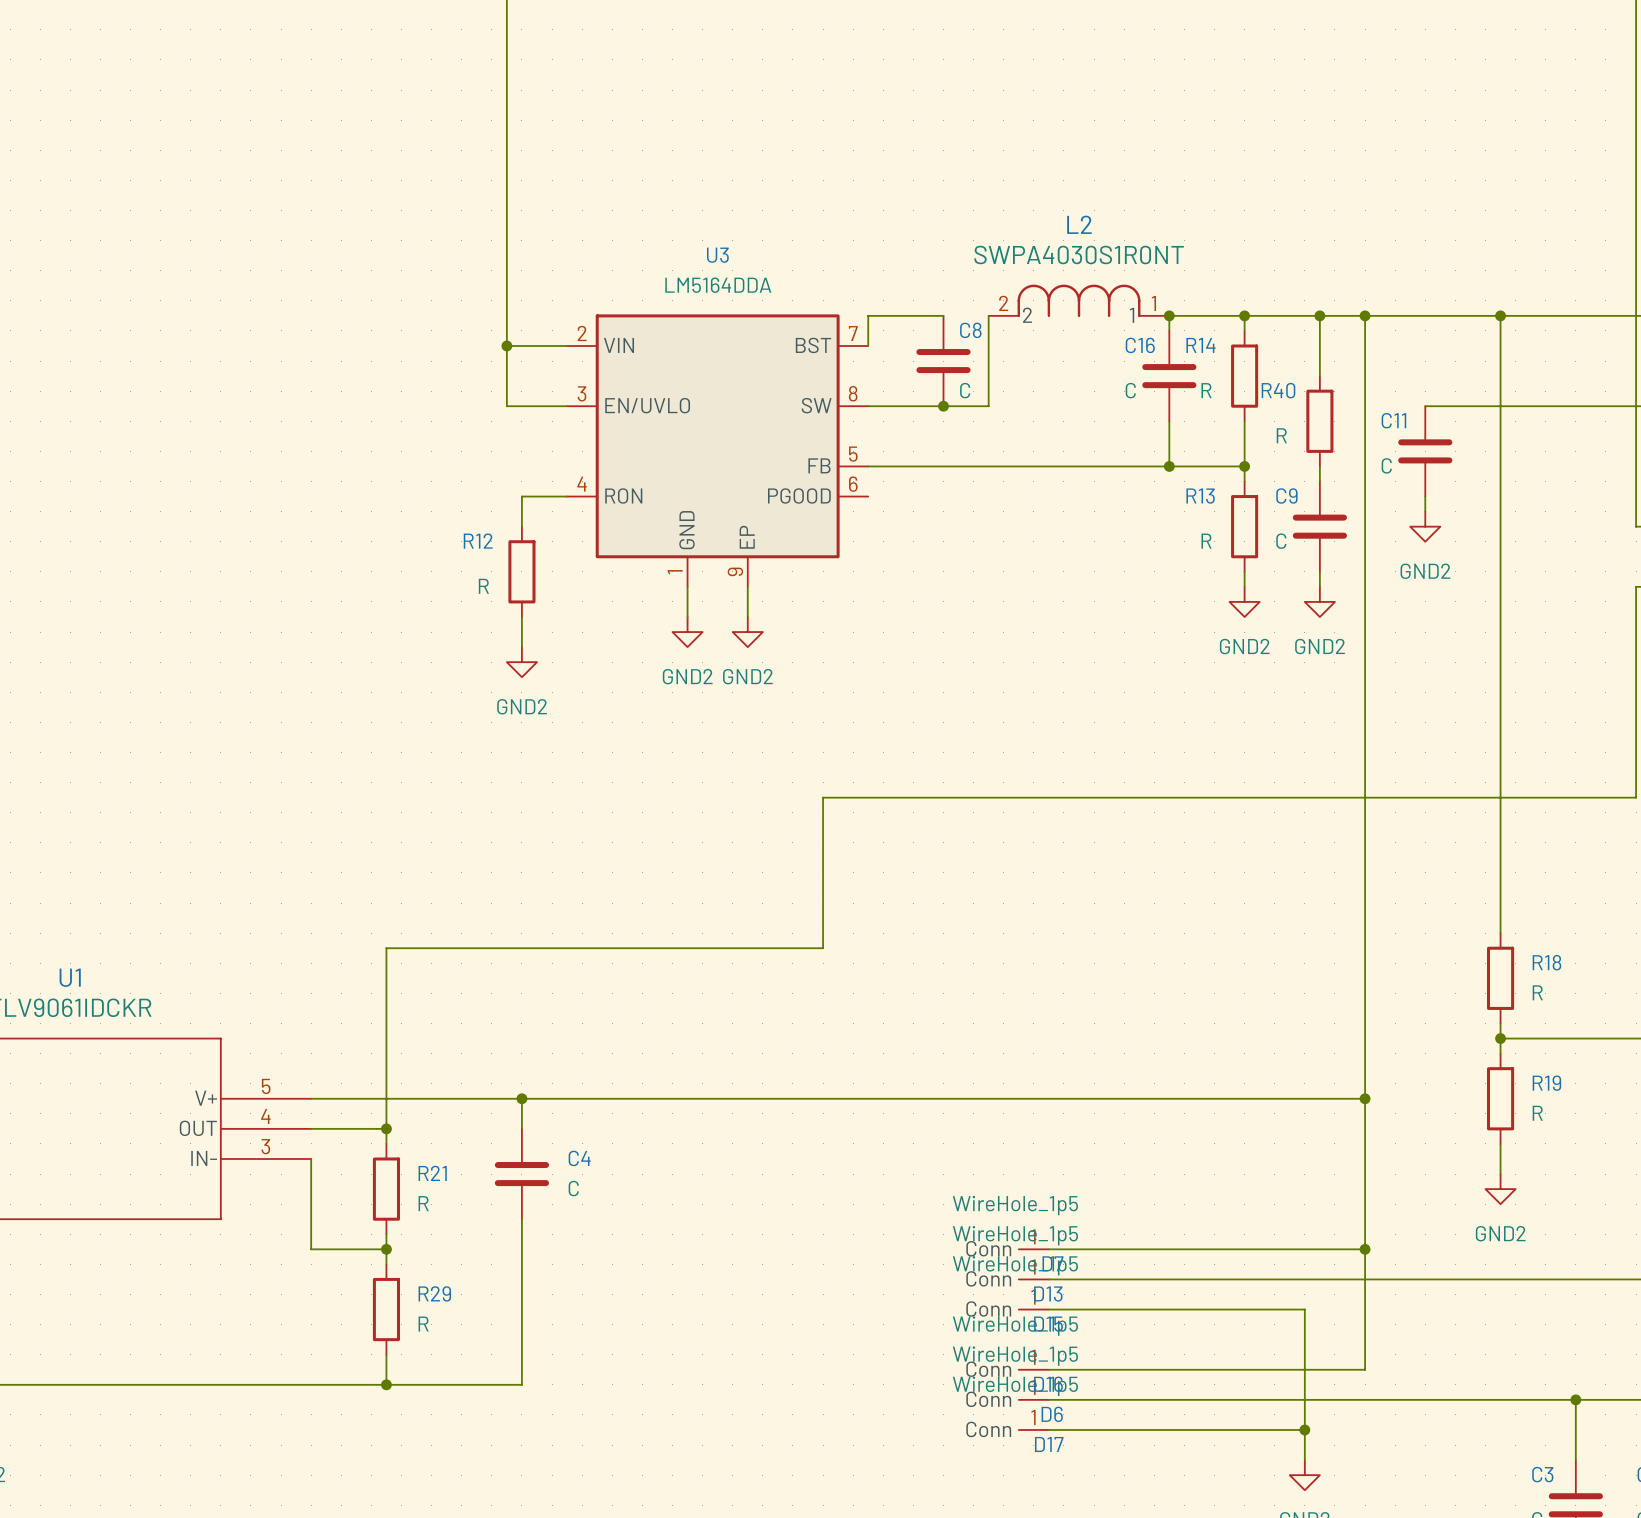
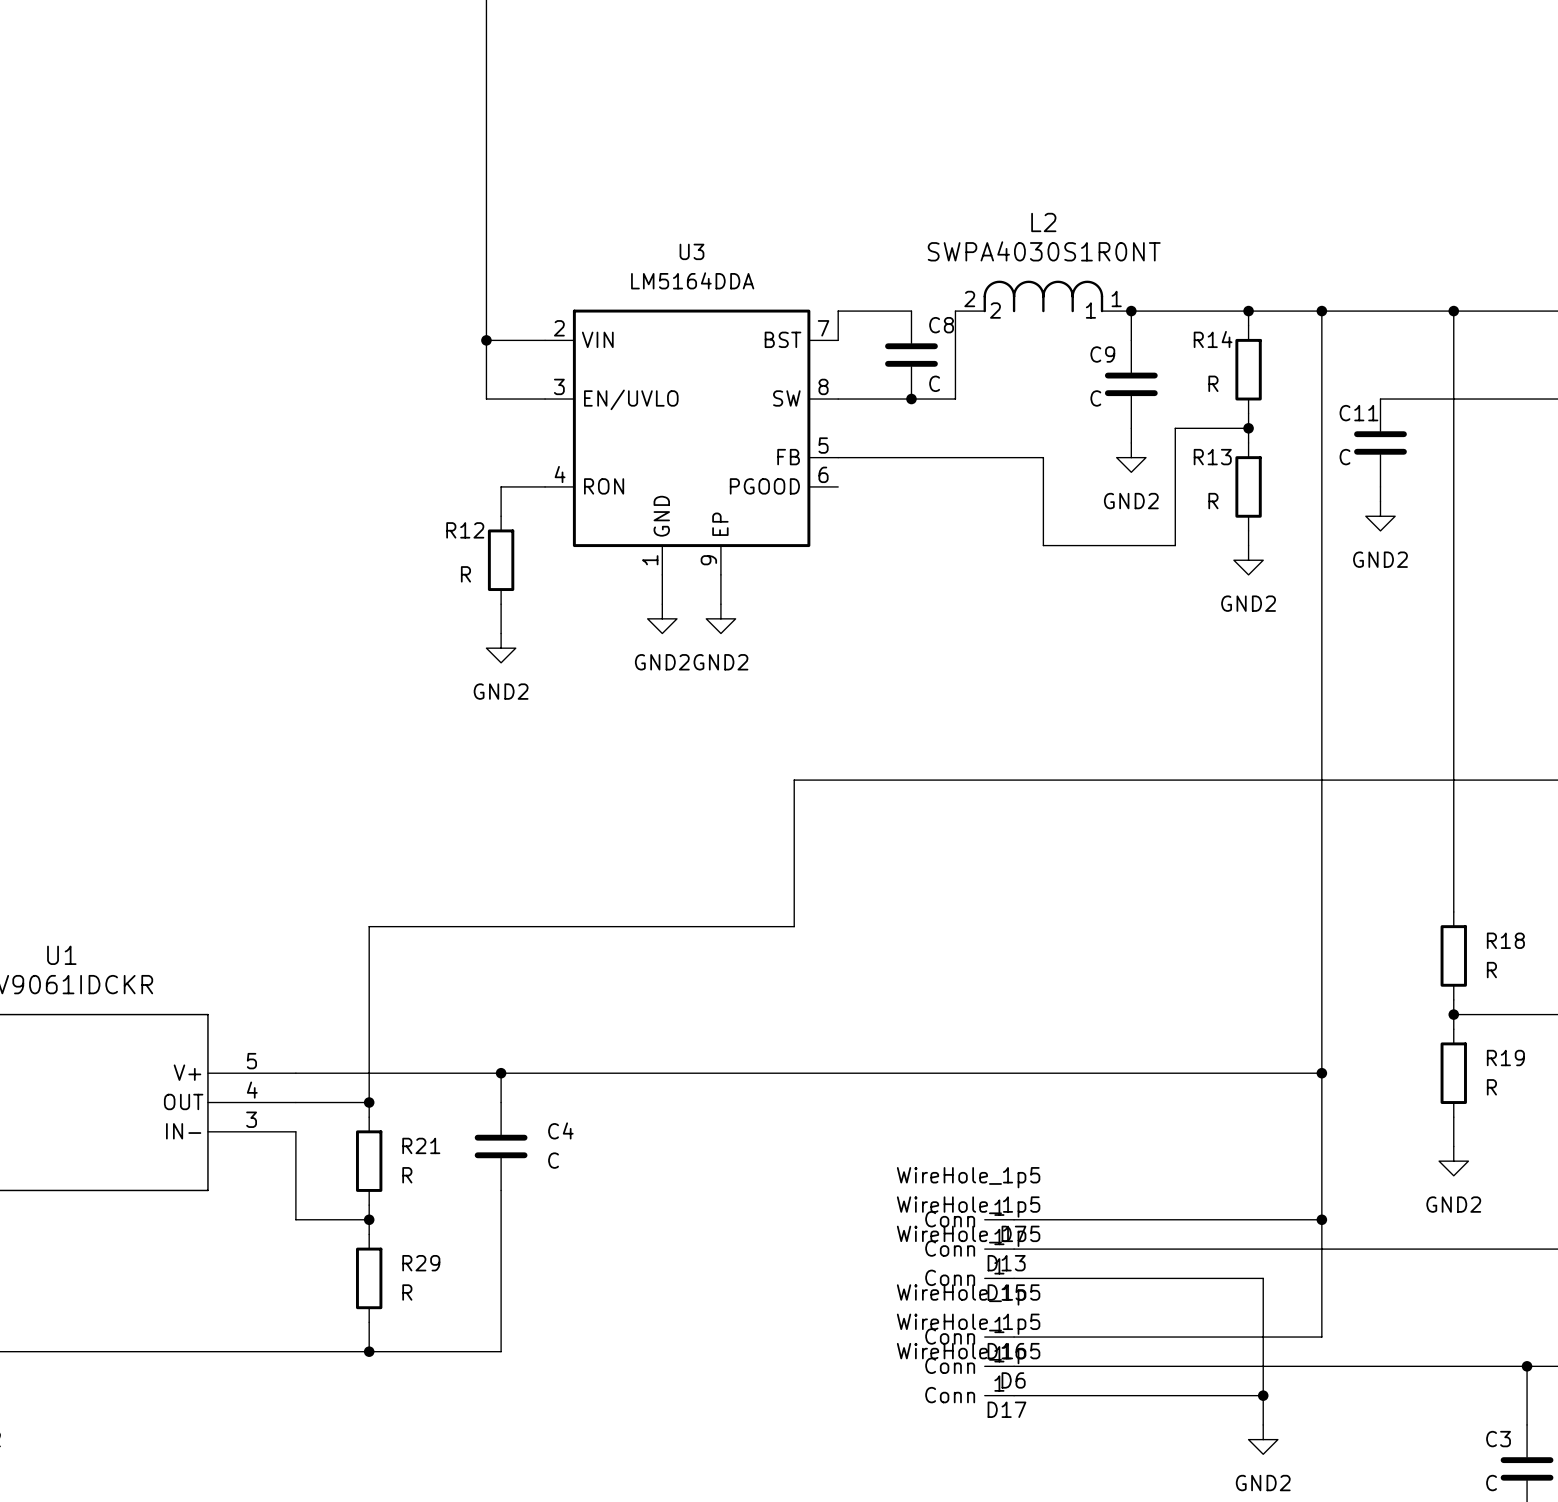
wire: (1244, 315) (1244, 330) -> (1248, 311) (1248, 325)
junction: (1244, 315) -> none
junction: none -> (1248, 311)
wire: (1319, 315) (1319, 376) -> none
junction: (1319, 315) -> none
C16: C (1169, 376) -> none
R14 position: (1244, 376) -> (1248, 369)
wire: (1244, 421) (1244, 481) -> none
wire: none -> (1248, 413) (1248, 442)
R40: R (1319, 421) -> none
wire: (1079, 466) (1244, 466) -> (1043, 457) (1043, 545) (1175, 545) (1175, 428) (1248, 428)
junction: (1169, 466) -> none
power symbol: none -> GND2 (1131, 457)
junction position: (1244, 466) -> (1248, 428)
wire: (1319, 466) (1319, 481) -> none
R13 position: (1244, 526) -> (1248, 486)
C9 position: (1319, 526) -> (1131, 384)
wire: (1244, 571) (1244, 586) -> none
power symbol: none -> GND2 (1248, 560)
wire: (1319, 571) (1319, 586) -> (1248, 530) (1248, 545)
power symbol: GND2 (1244, 601) -> none
power symbol: GND2 (1319, 601) -> none

